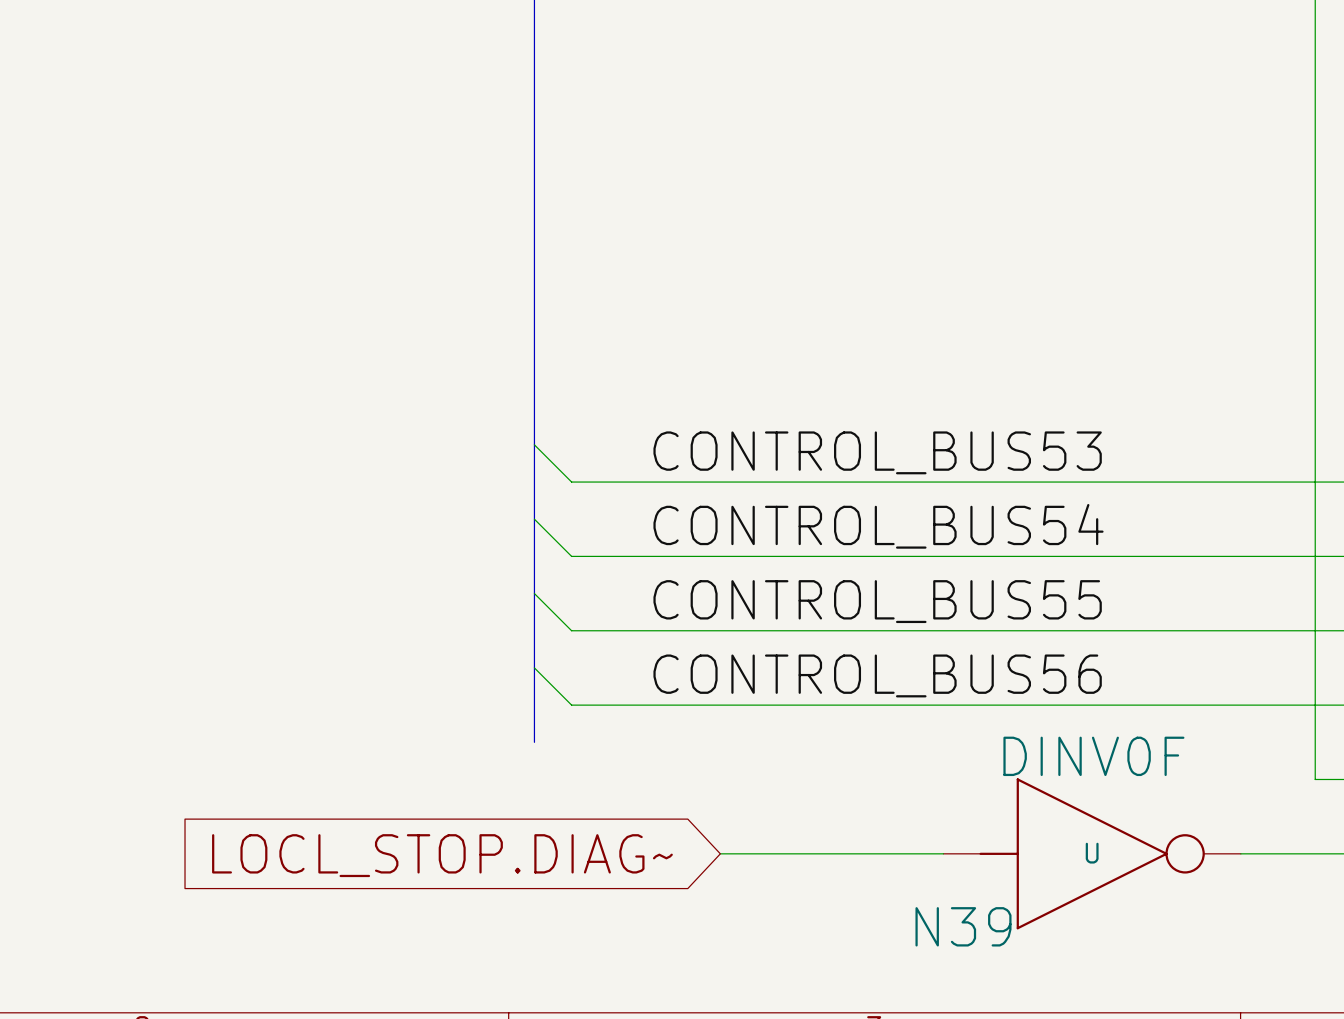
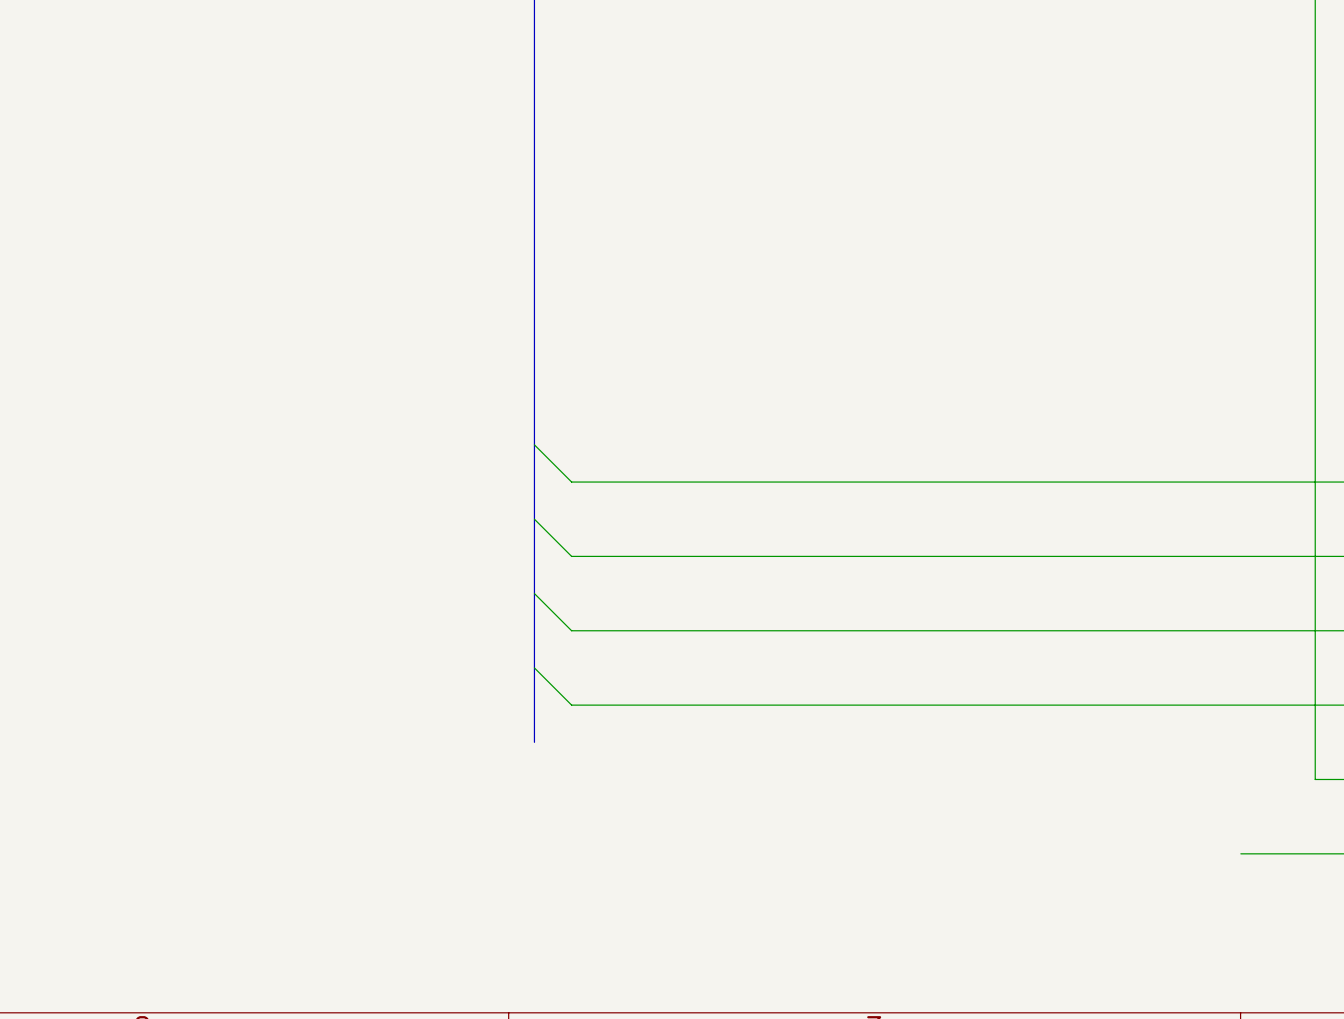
label: CONTROL_BUS53 (877, 452) -> none
label: CONTROL_BUS54 (878, 526) -> none
label: CONTROL_BUS55 (877, 601) -> none
label: CONTROL_BUS56 (877, 675) -> none
wire: (720, 853) (943, 853) -> none
U: (1092, 853) -> none
global label: LOCL_STOP.DIAG~ (442, 855) -> none

